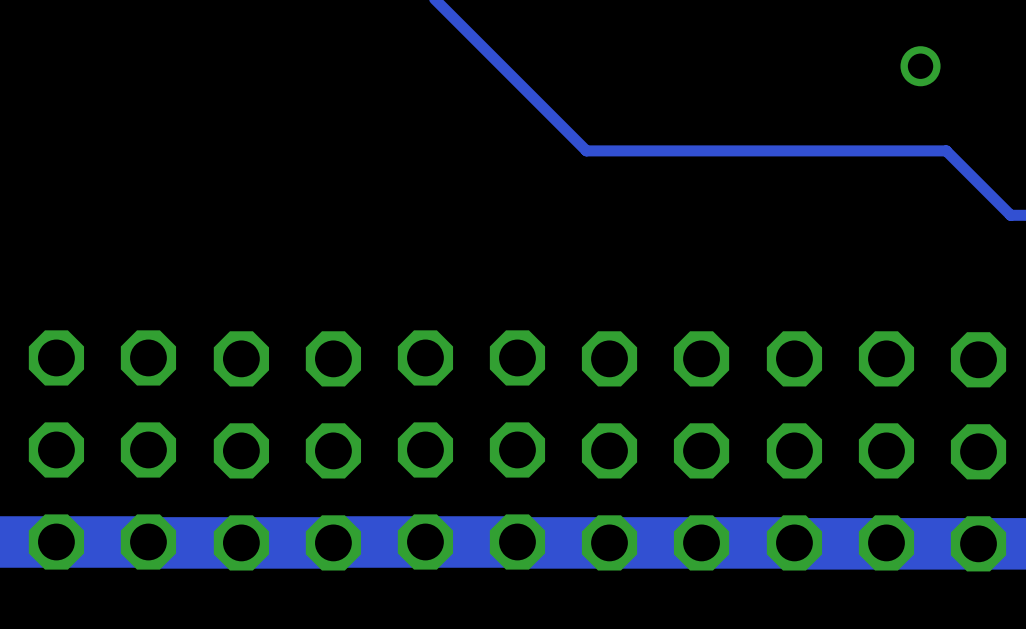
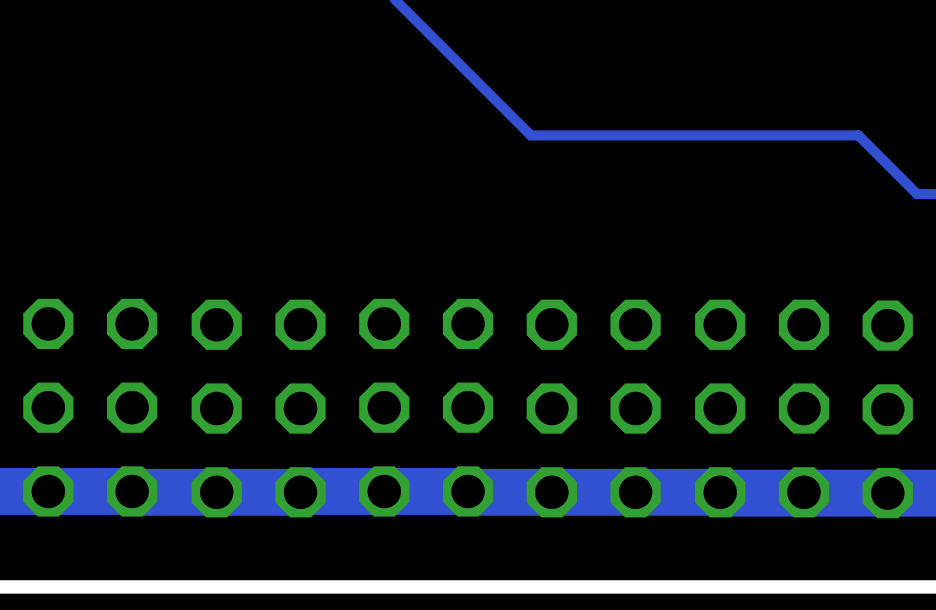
via: (920, 66) -> none

